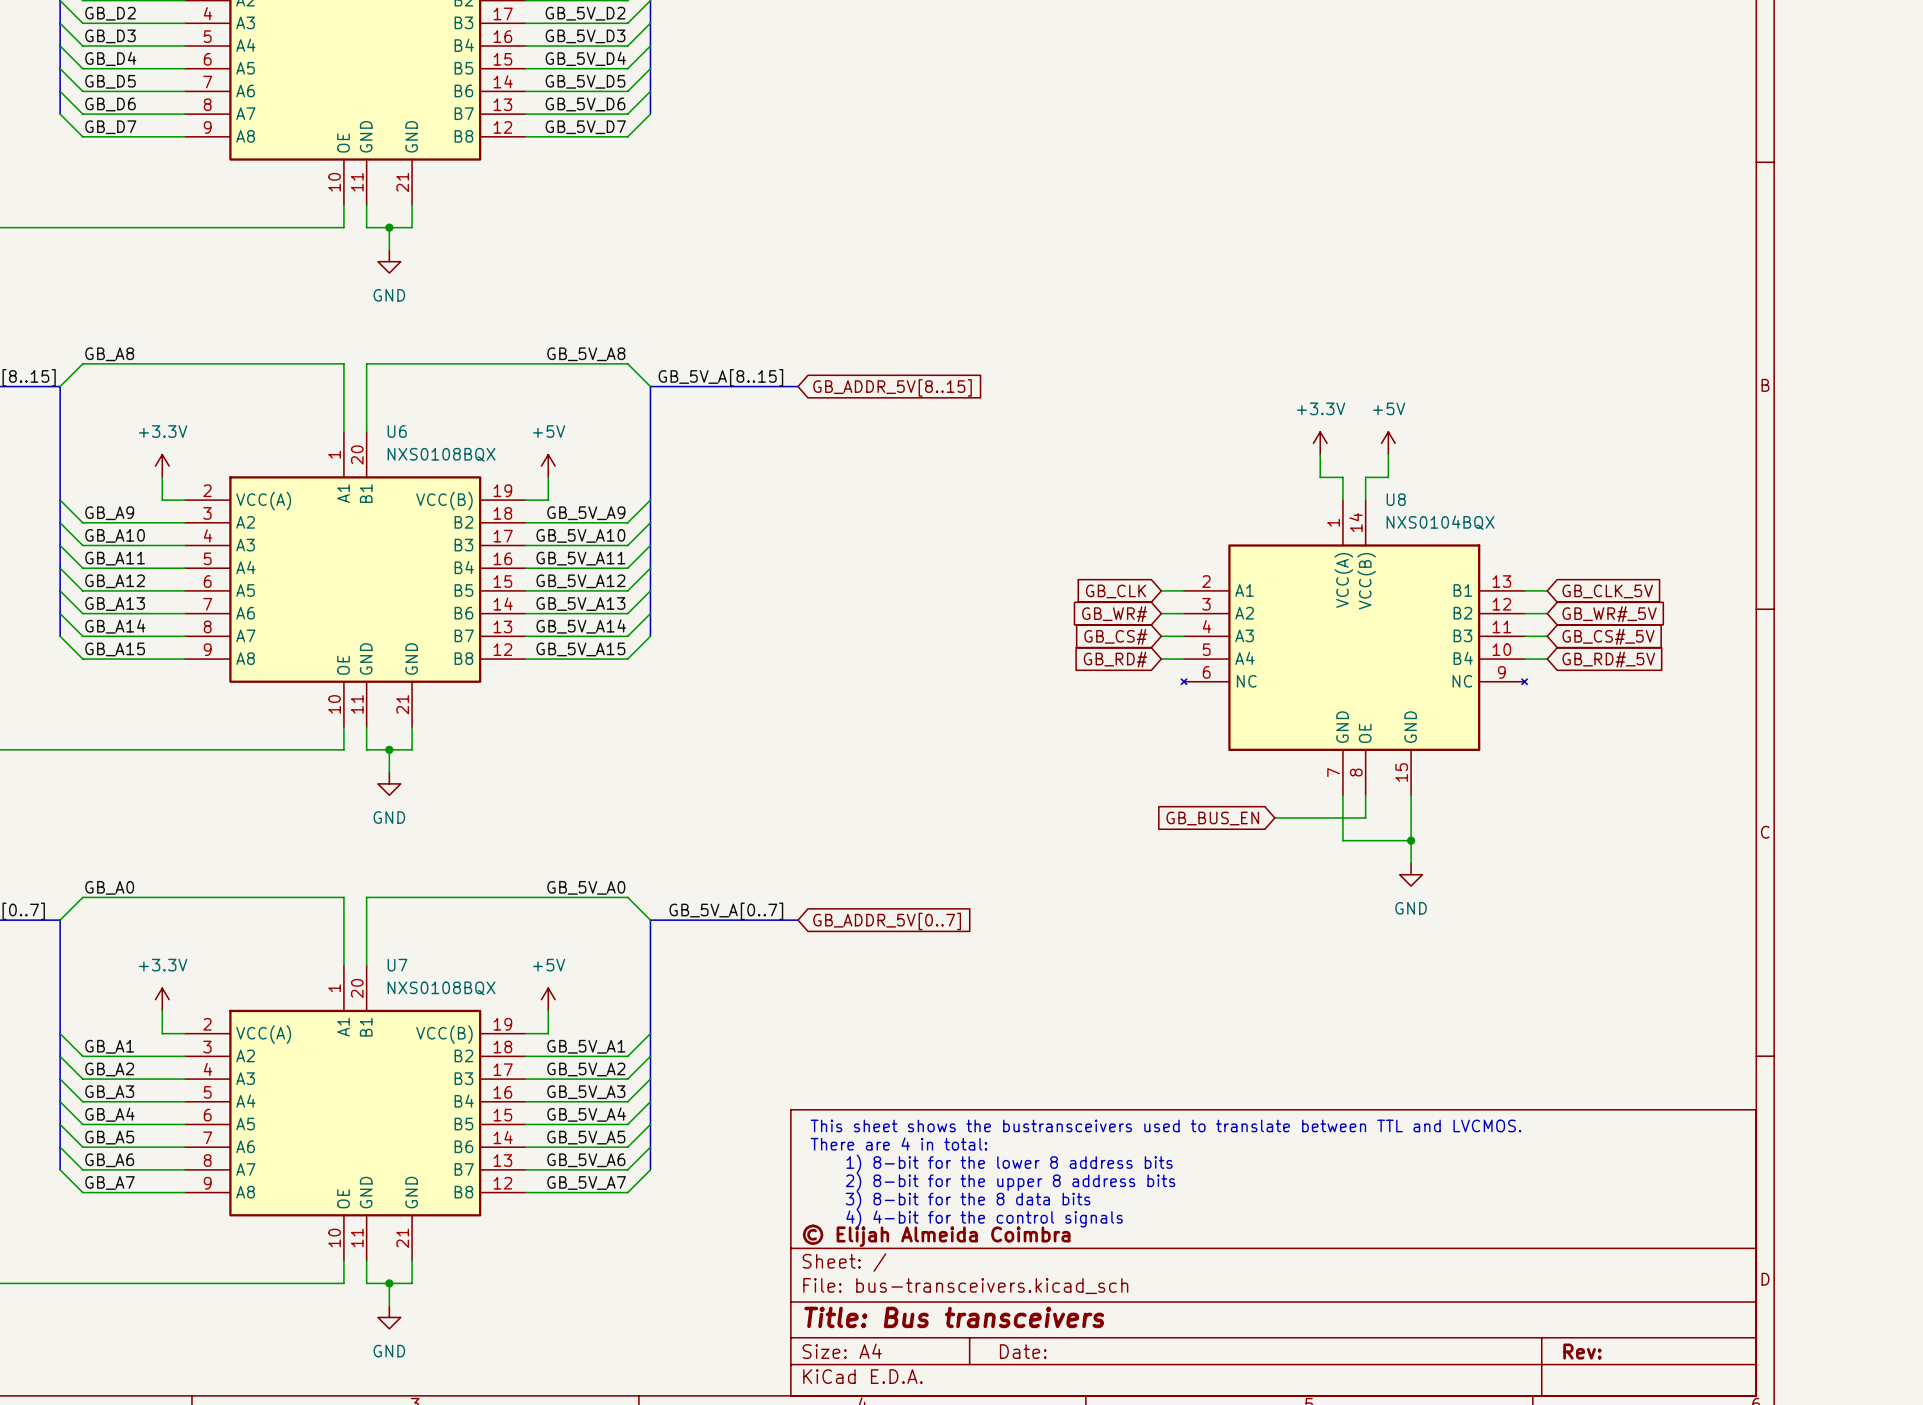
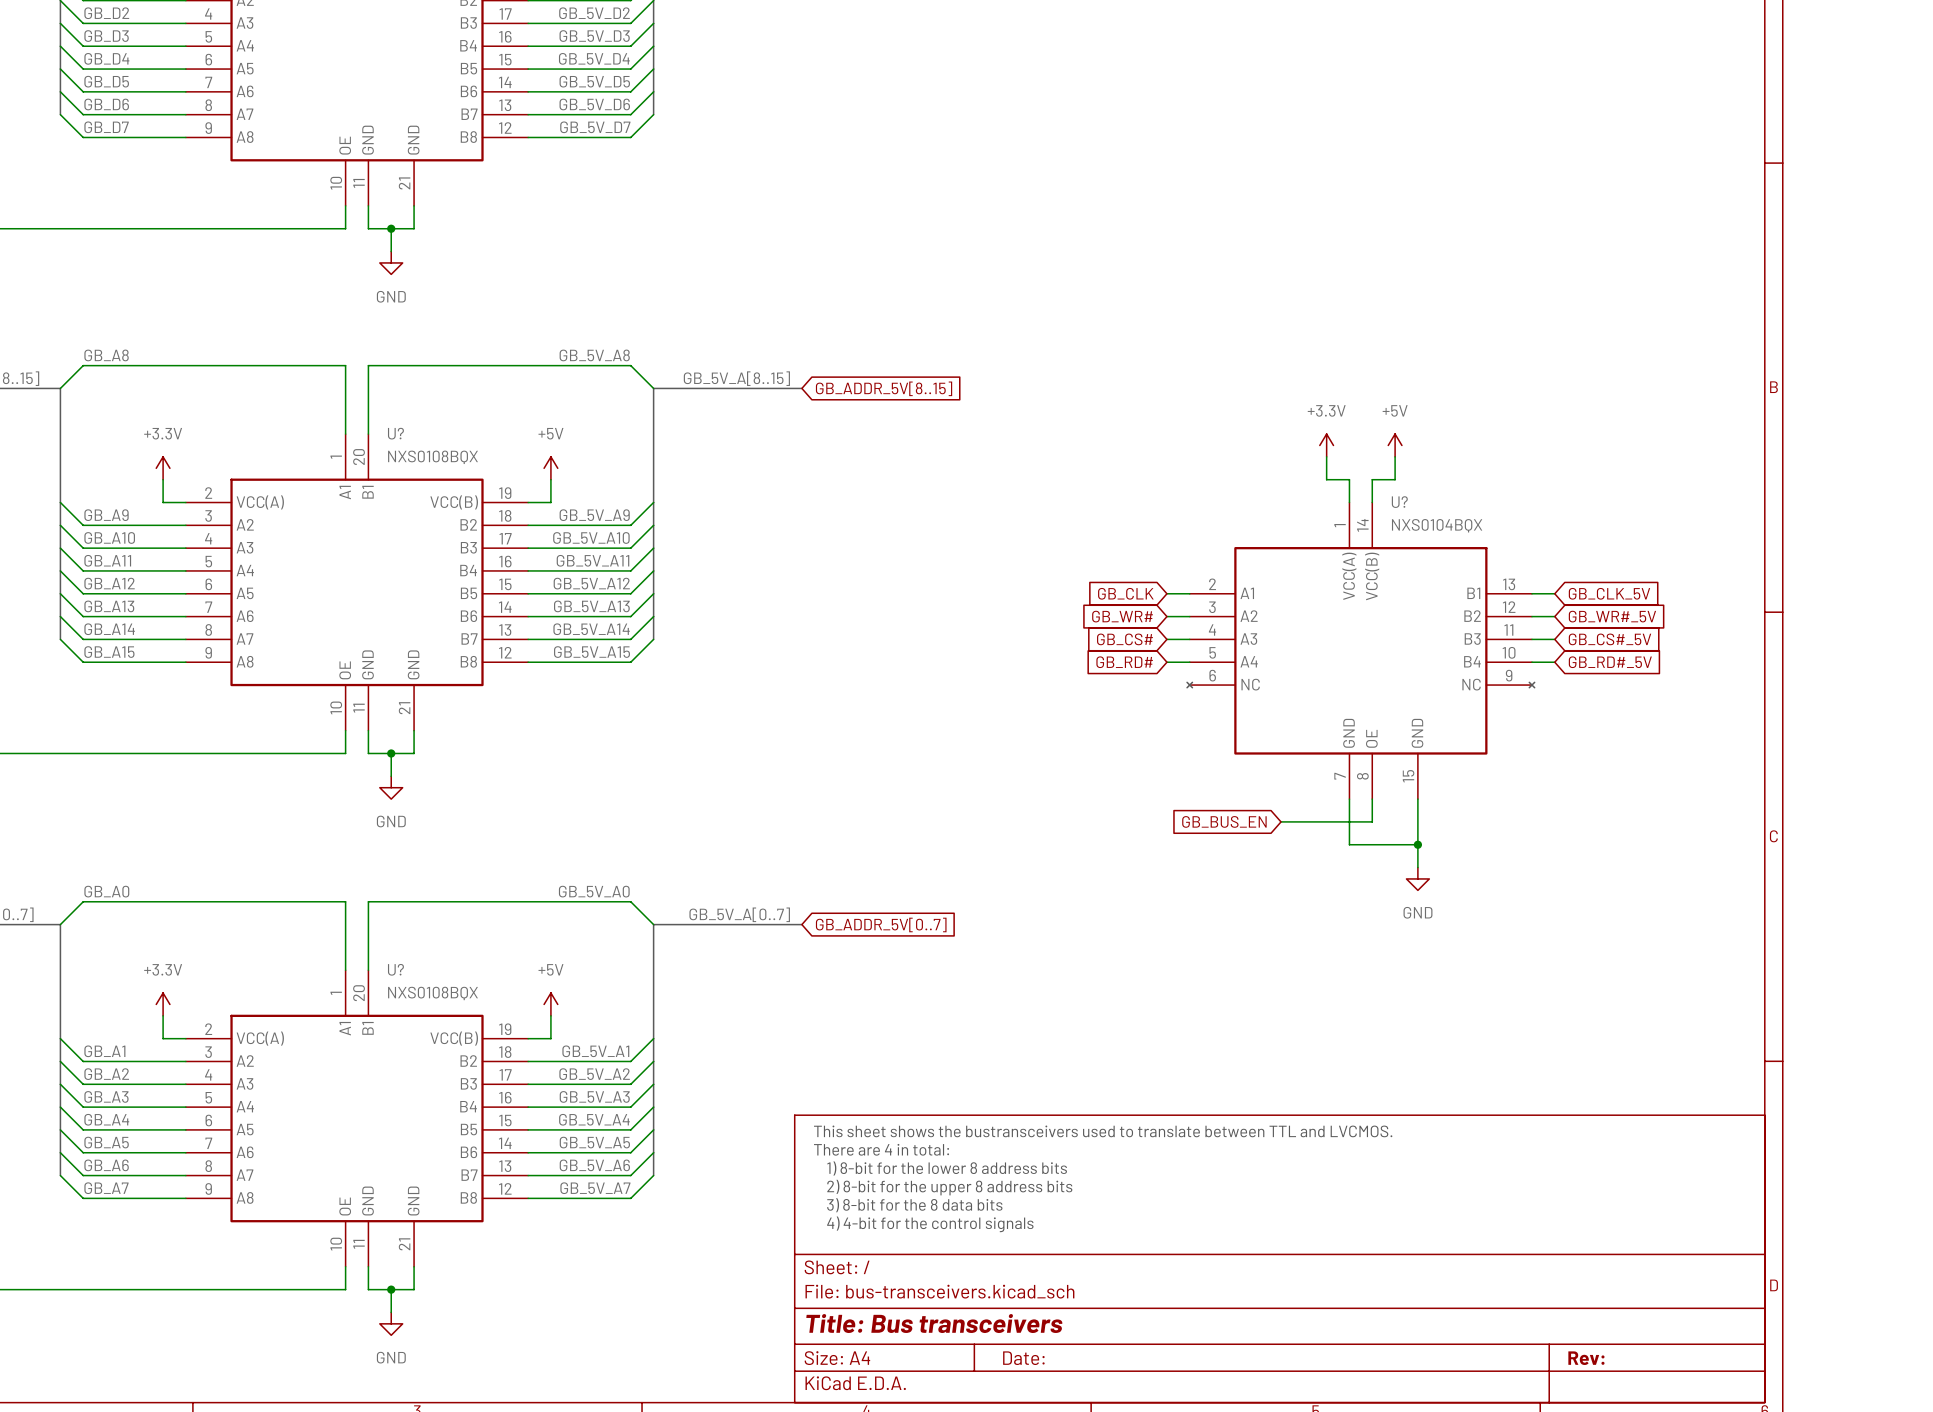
U6 name: U6 (397, 431) -> U? (395, 433)
U8 name: U8 (1396, 499) -> U? (1399, 502)
U7 name: U7 (397, 965) -> U? (395, 969)
title block: © Elijah Almeida Coimbra (936, 1235) -> none

